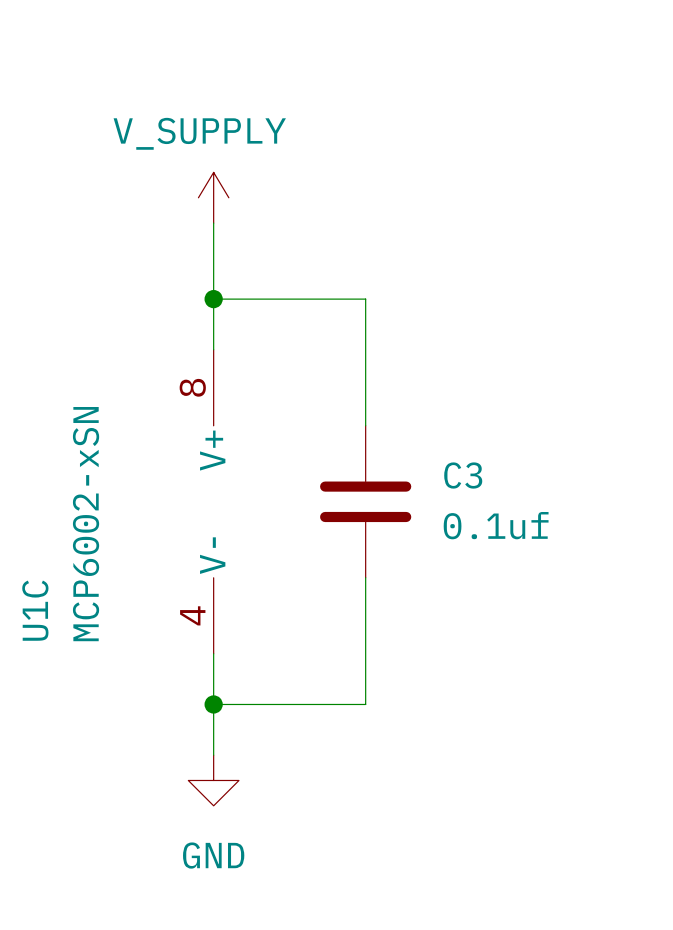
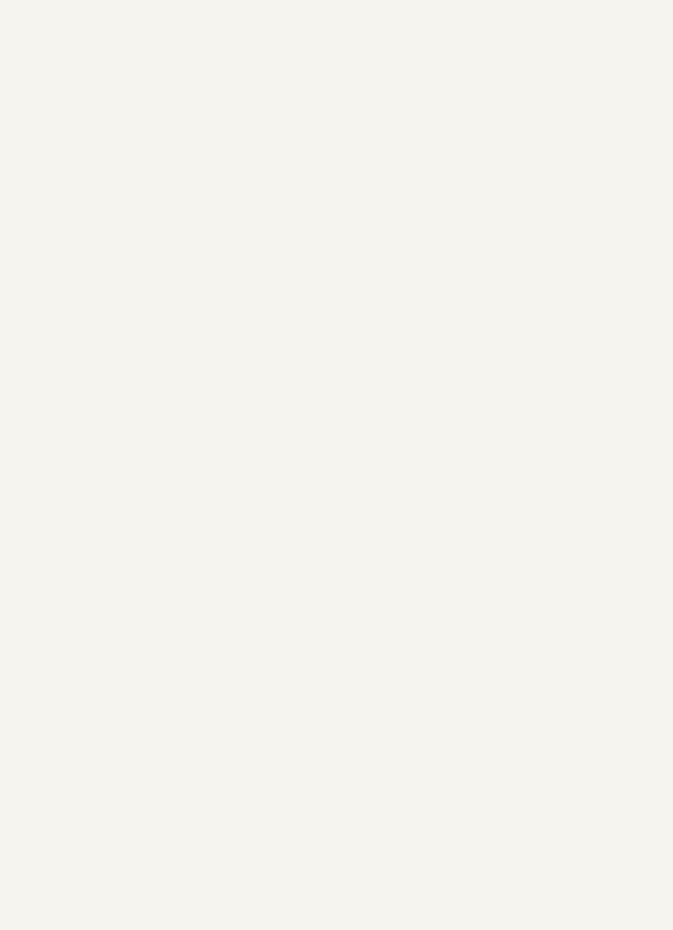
power symbol: V_SUPPLY (213, 197) -> none
wire: (213, 223) (213, 349) -> none
wire: (213, 299) (365, 299) (365, 425) -> none
junction: (213, 299) -> none
U1C: MCP6002-xSN (213, 501) -> none
C3: 0.1uf (365, 501) -> none
wire: (365, 577) (365, 704) (213, 704) -> none
wire: (213, 653) (213, 755) -> none
junction: (213, 704) -> none
power symbol: GND (213, 780) -> none

